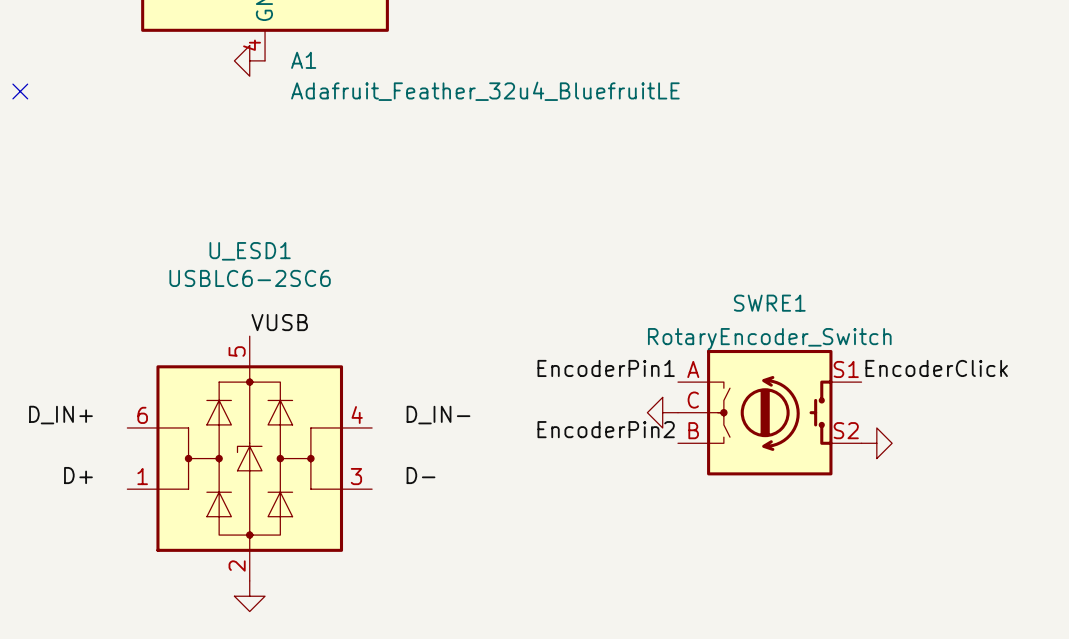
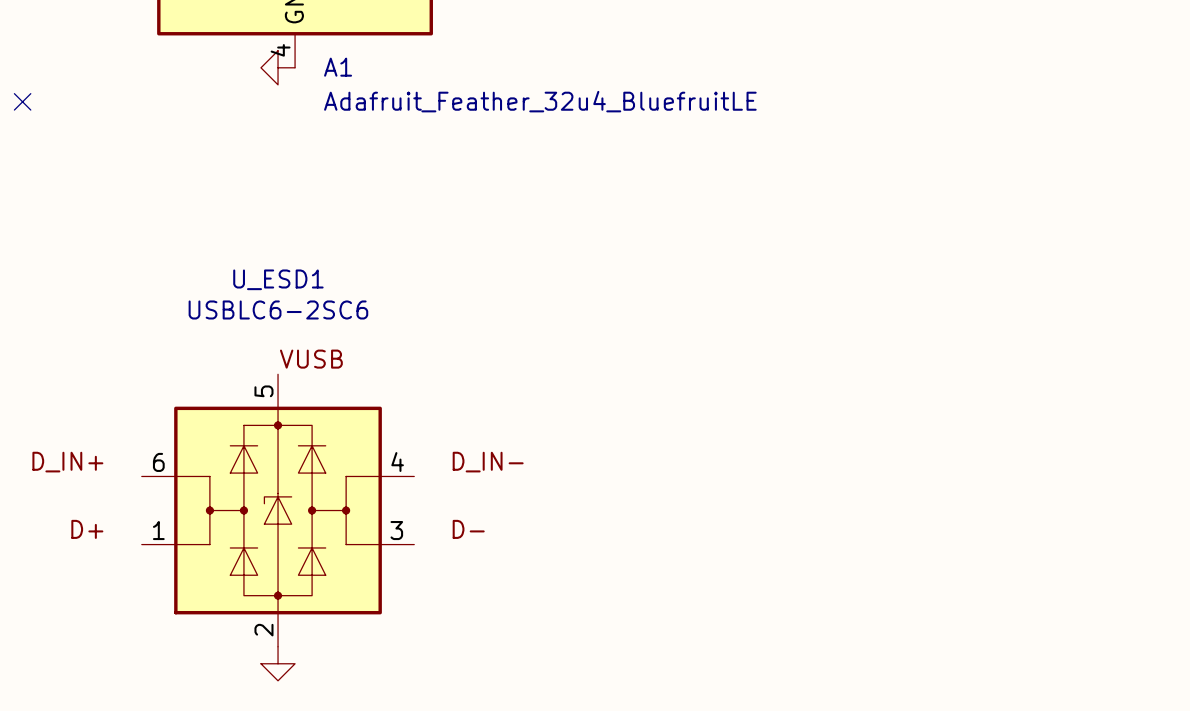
label: EncoderPin1 (606, 368) -> none
label: EncoderClick (936, 368) -> none
power symbol: (662, 412) -> none
SWRE1: RotaryEncoder_Switch (769, 412) -> none
label: EncoderPin2 (606, 429) -> none
power symbol: (876, 443) -> none

